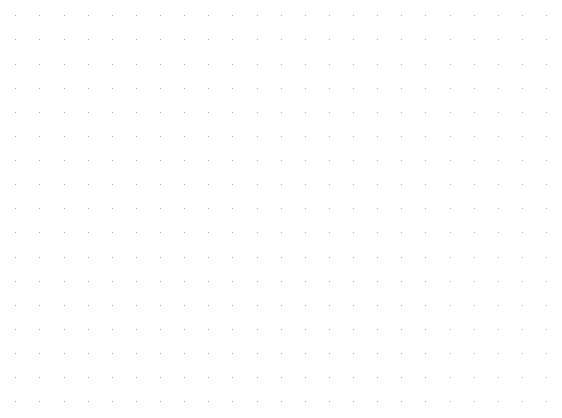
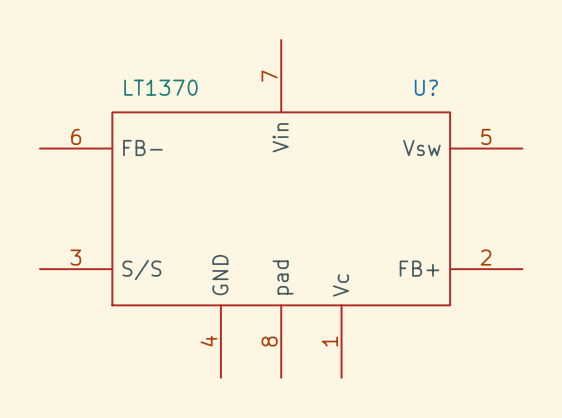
U?: none -> LT1370 (281, 208)

